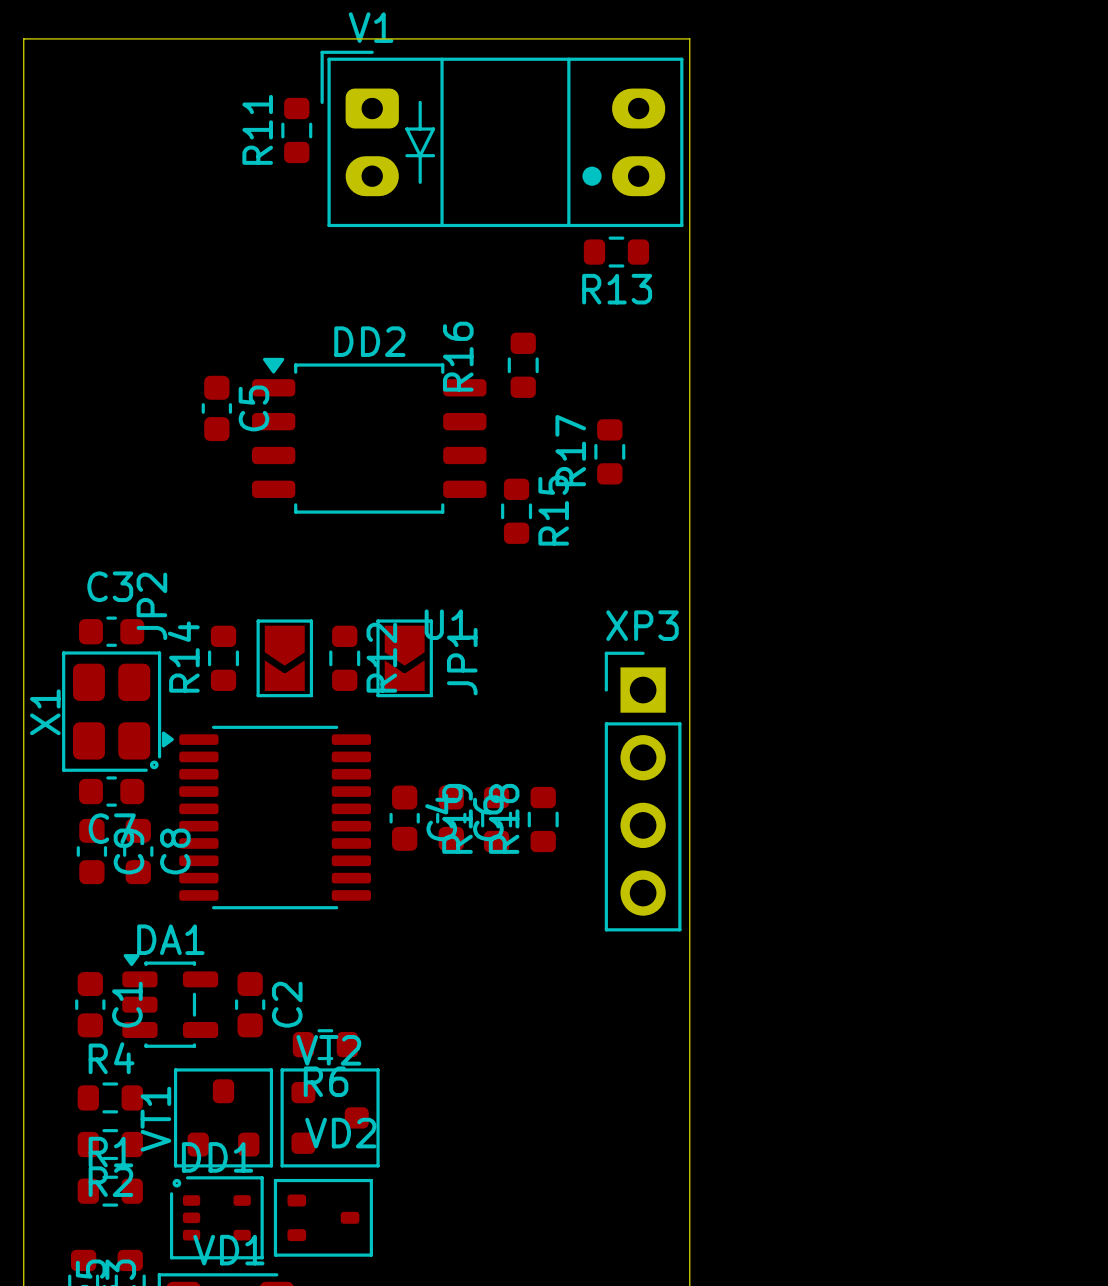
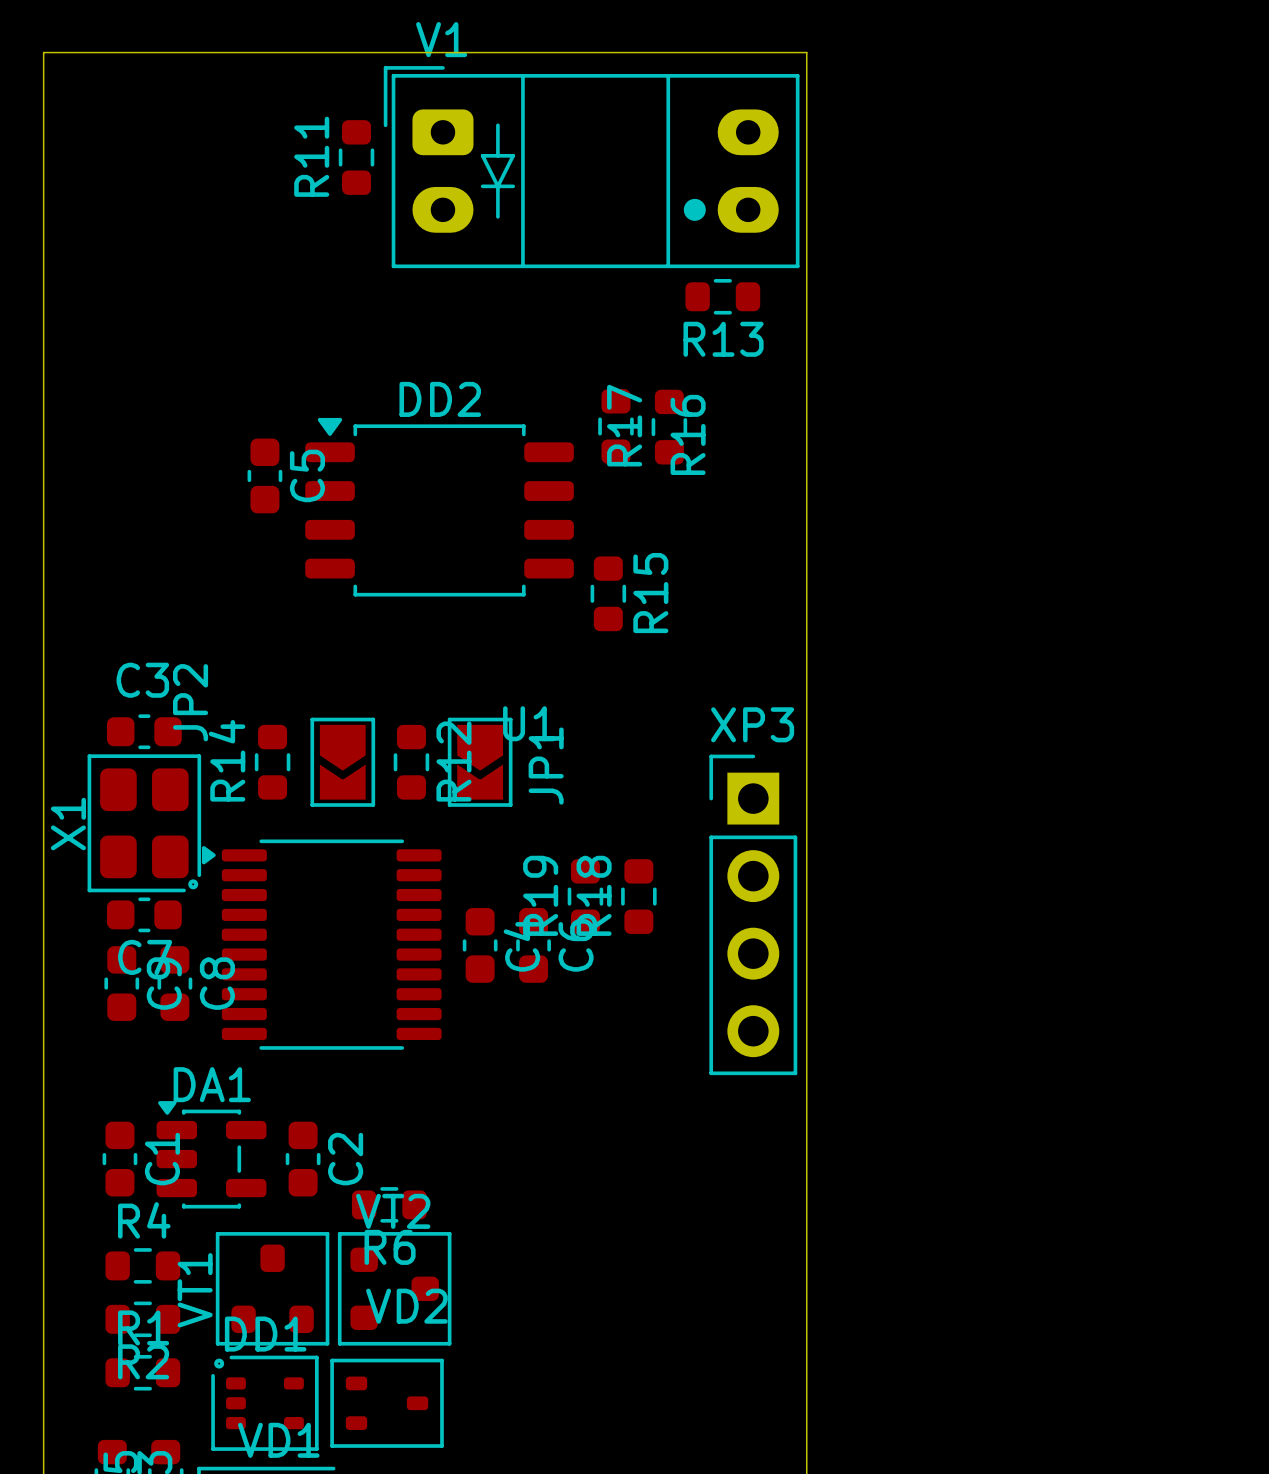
R16 name position: R16 (458, 356) -> R16 (688, 434)
R17 position: (609, 451) -> (669, 427)
R19 position: (496, 819) -> (585, 896)
R18 position: (543, 819) -> (638, 896)

